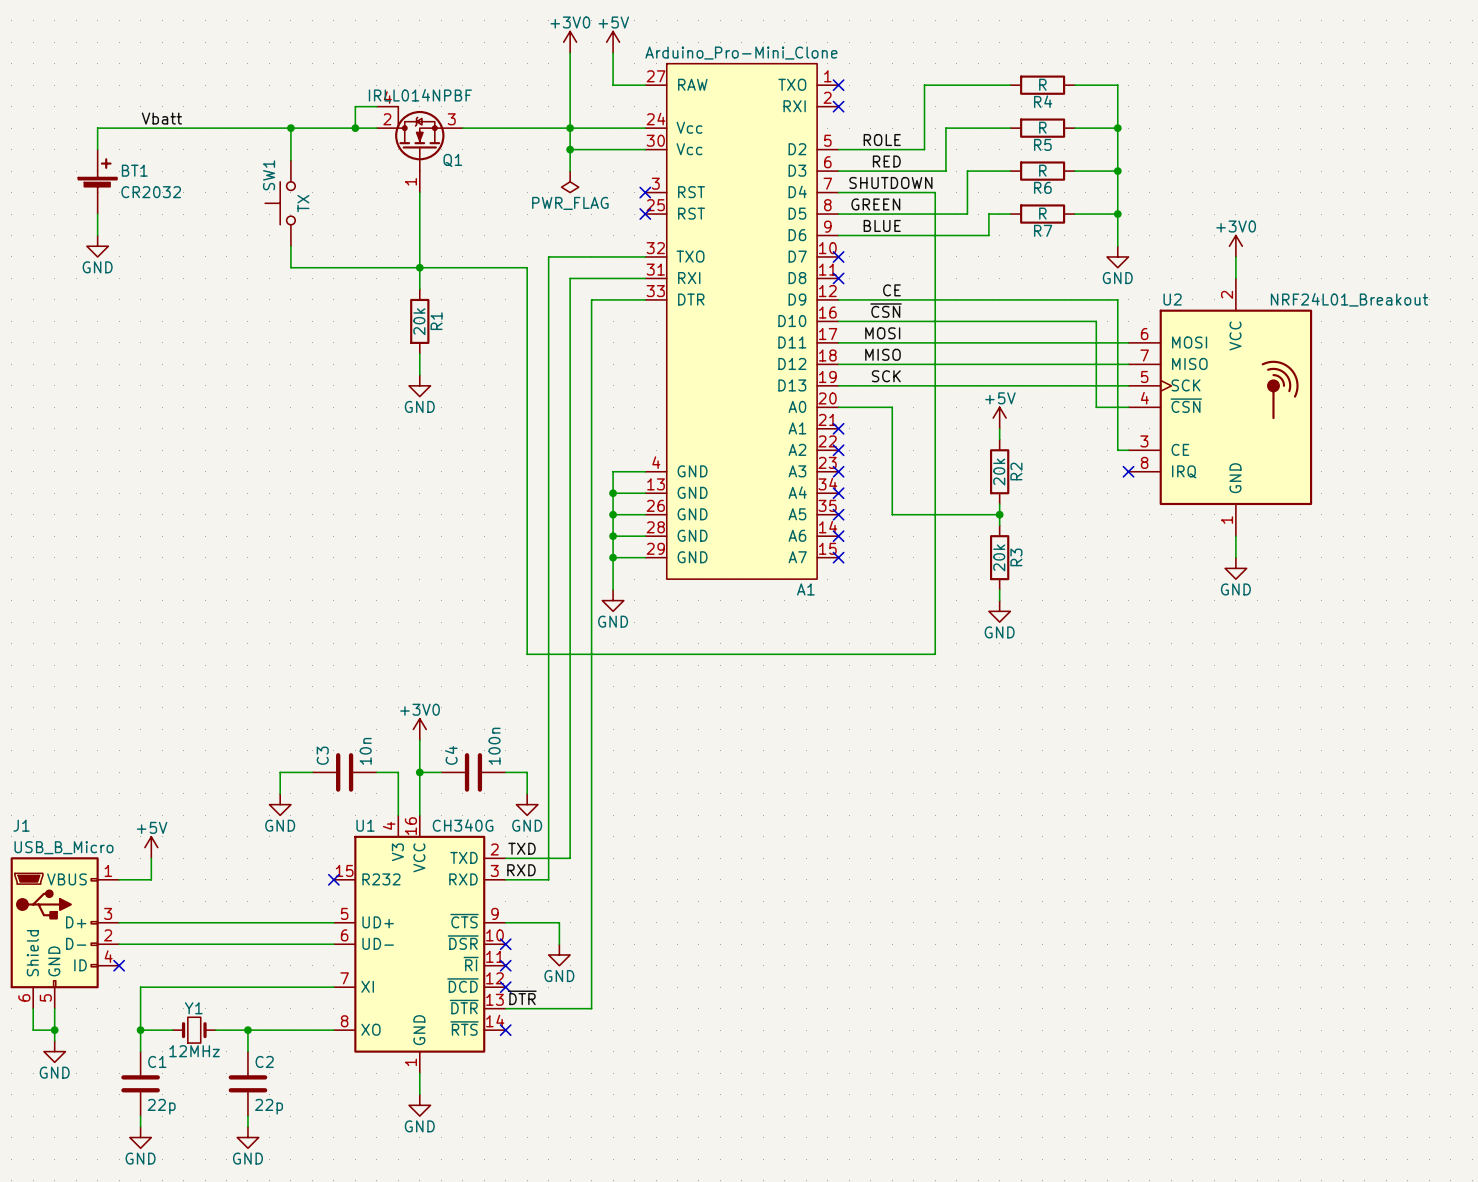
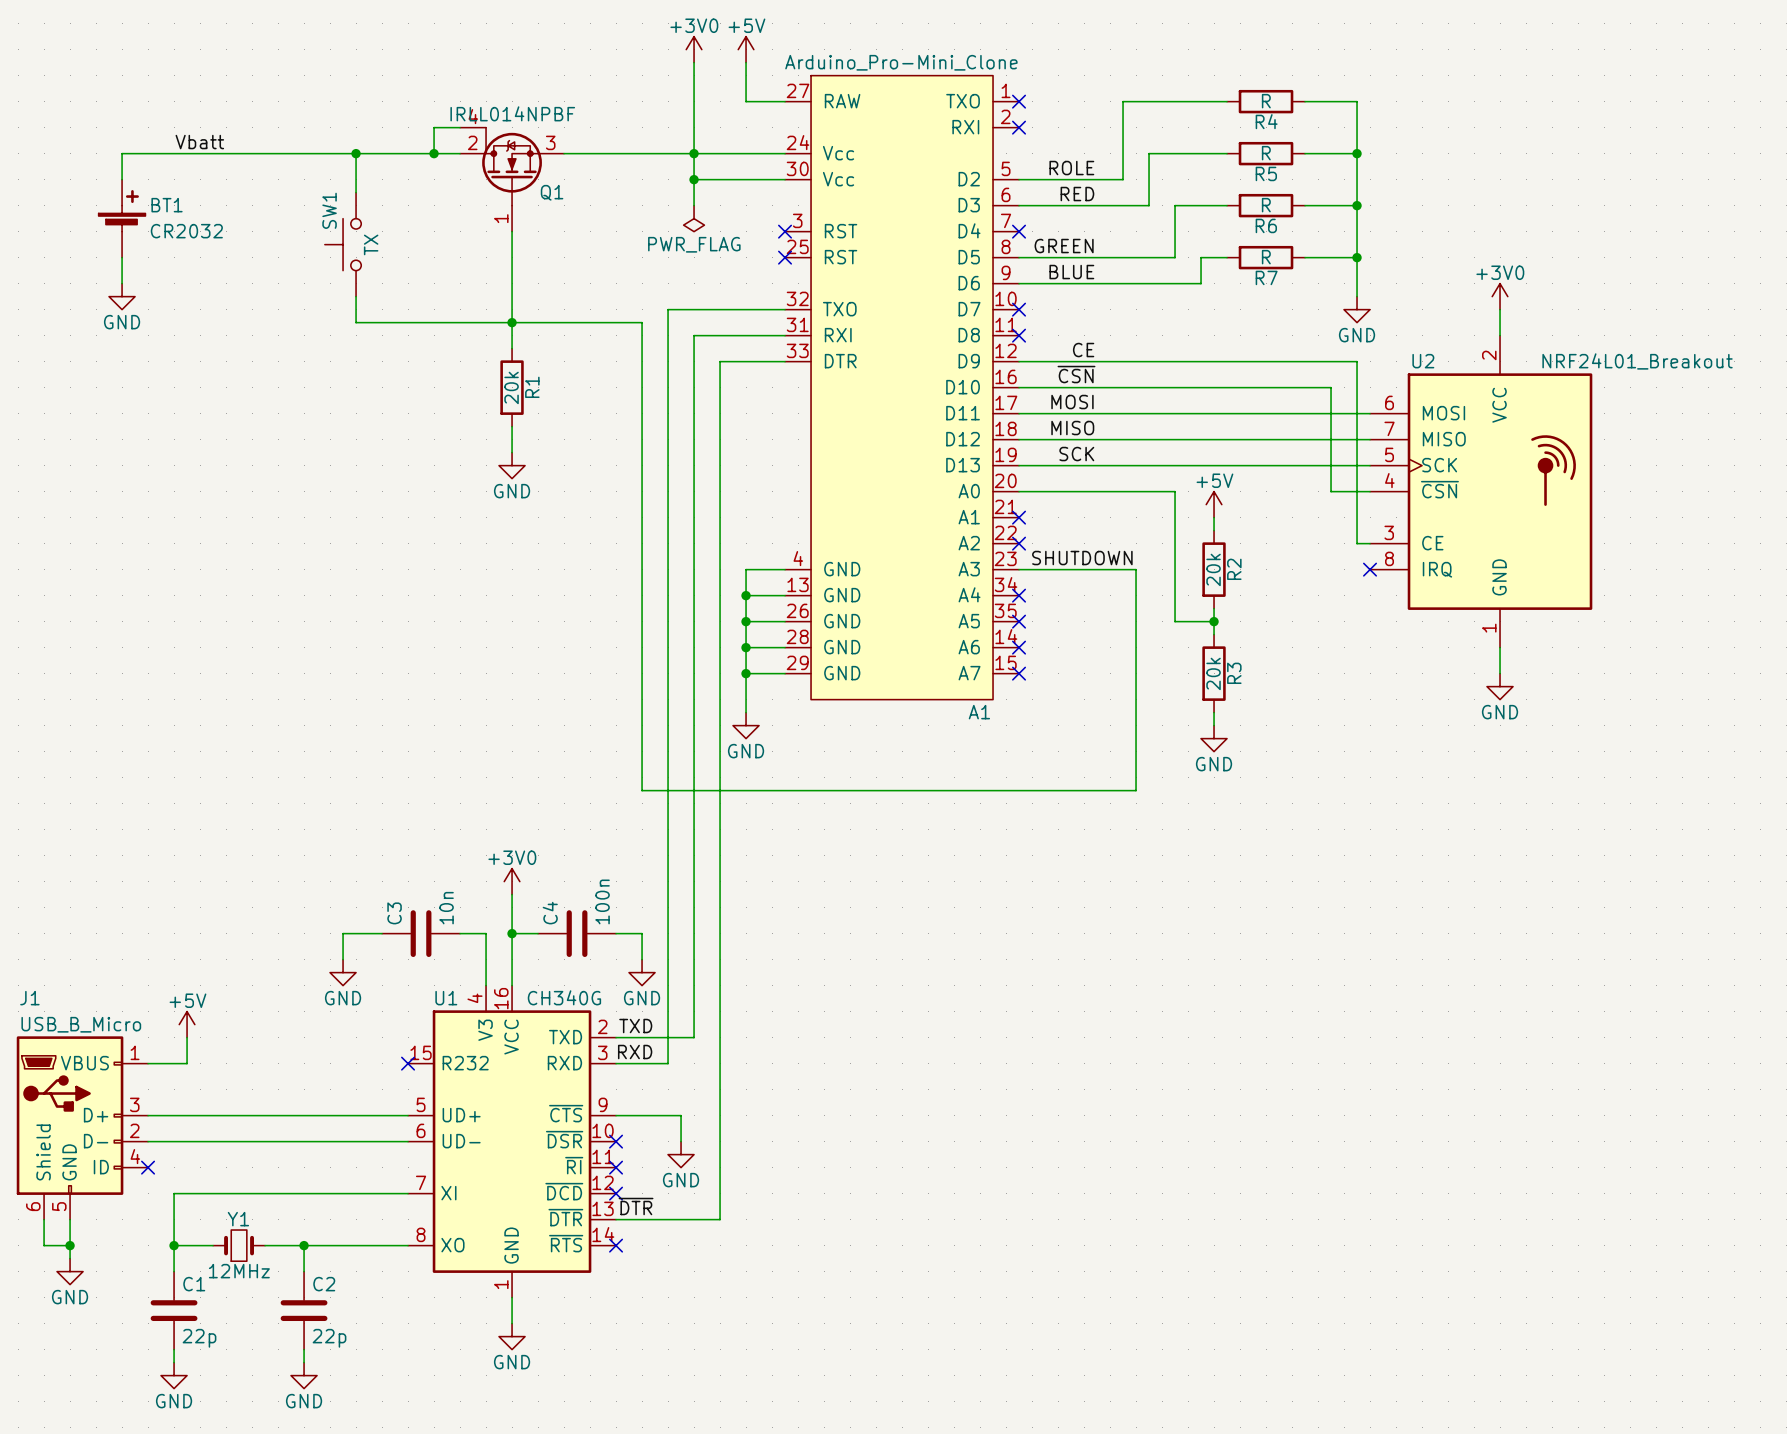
label: SHUTDOWN (890, 182) -> none
wire: (838, 192) (935, 192) (935, 471) -> (1019, 569) (1136, 569)
no-connect mark: none -> (1019, 231)
wire: (892, 407) (892, 514) (967, 514) -> (1084, 491) (1175, 491) (1175, 621)
label: none -> SHUTDOWN (1082, 558)
no-connect mark: (838, 471) -> none

